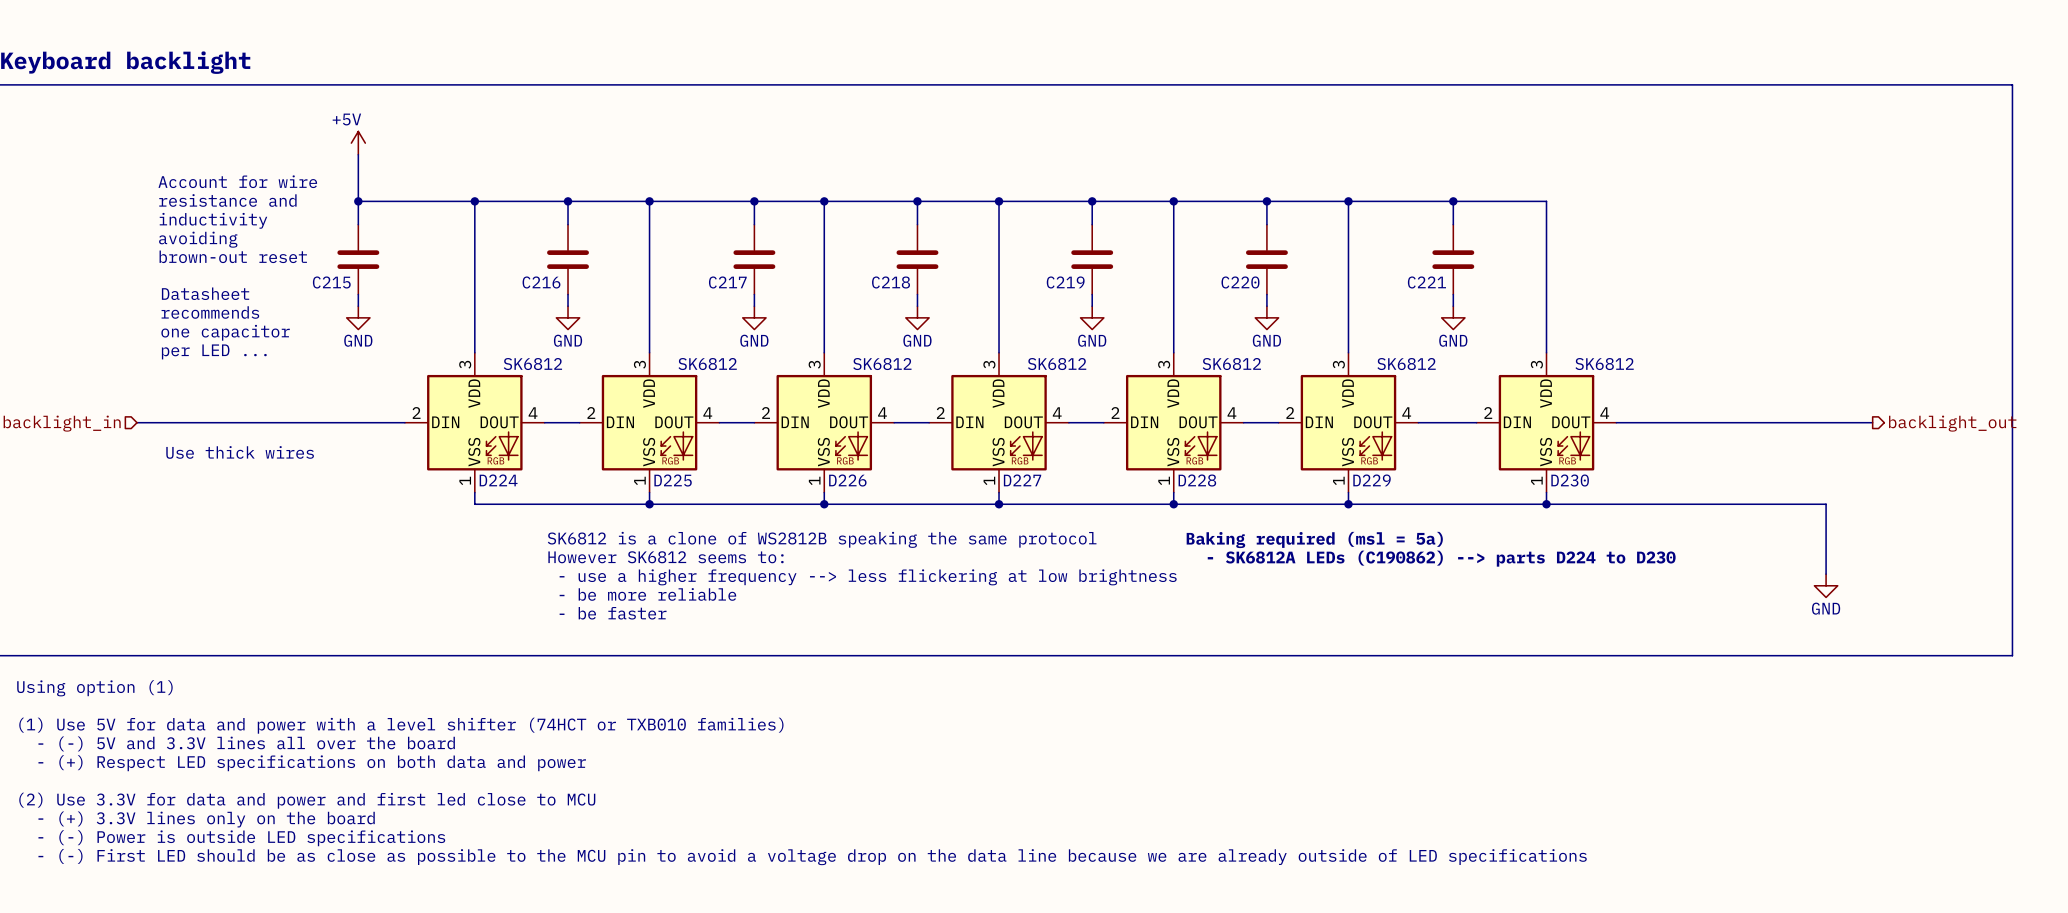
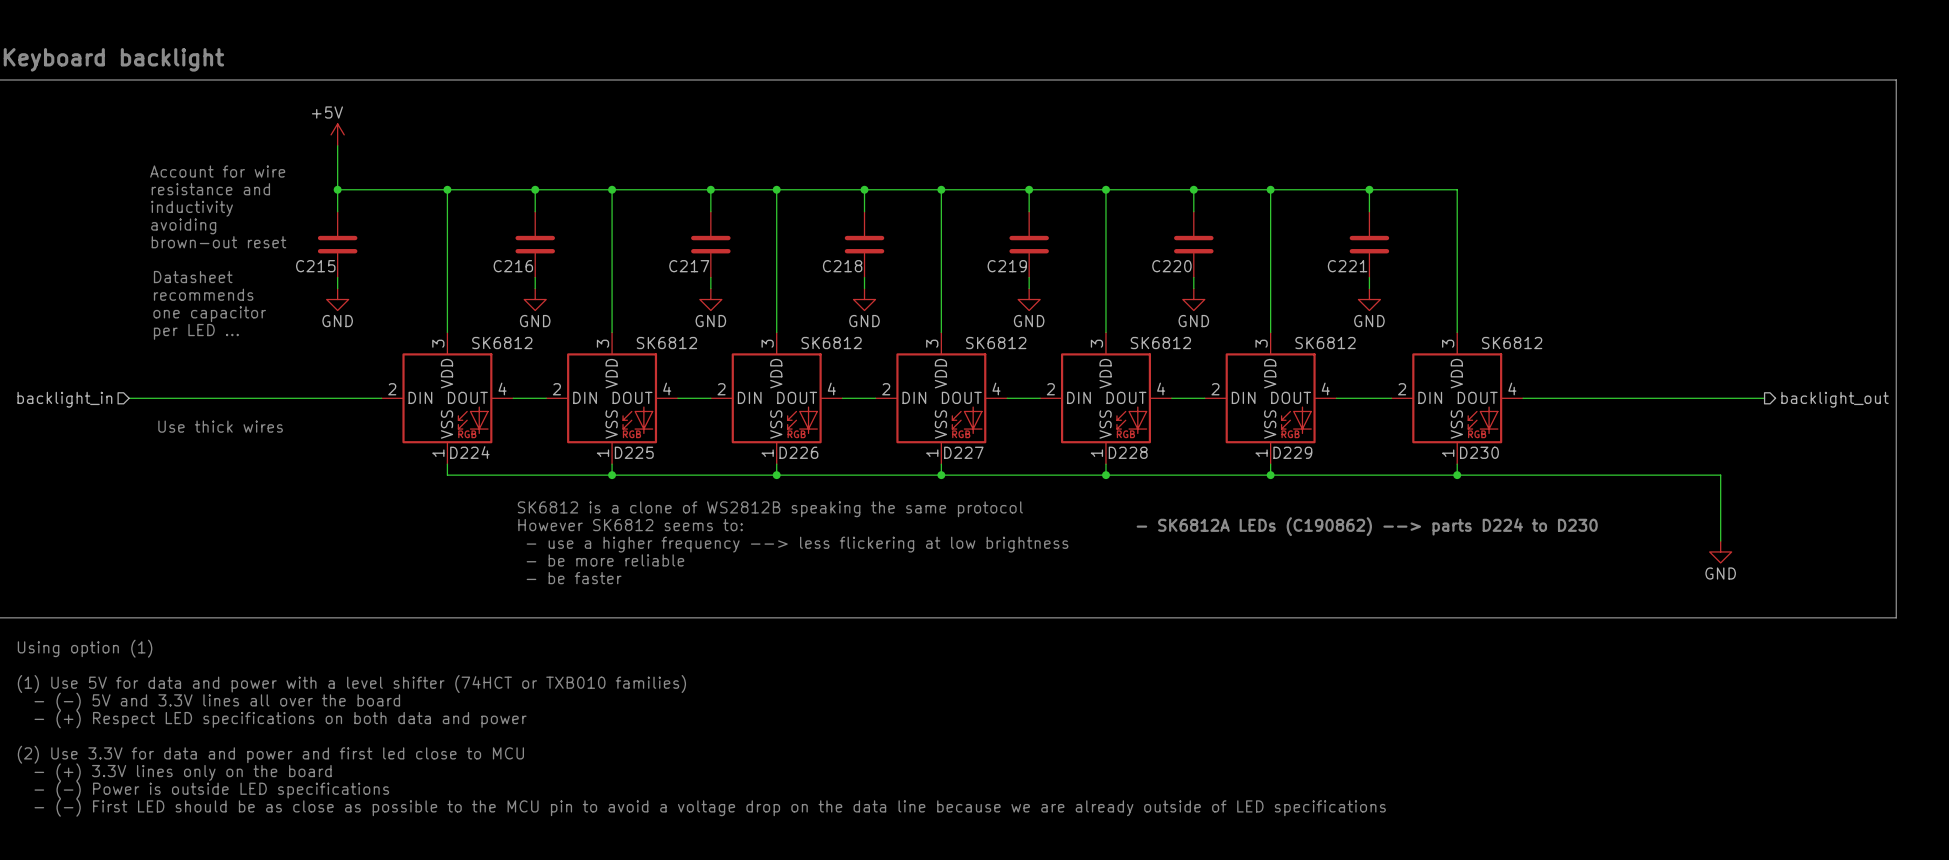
text: Baking required (msl = 5a) (1314, 539) -> none

